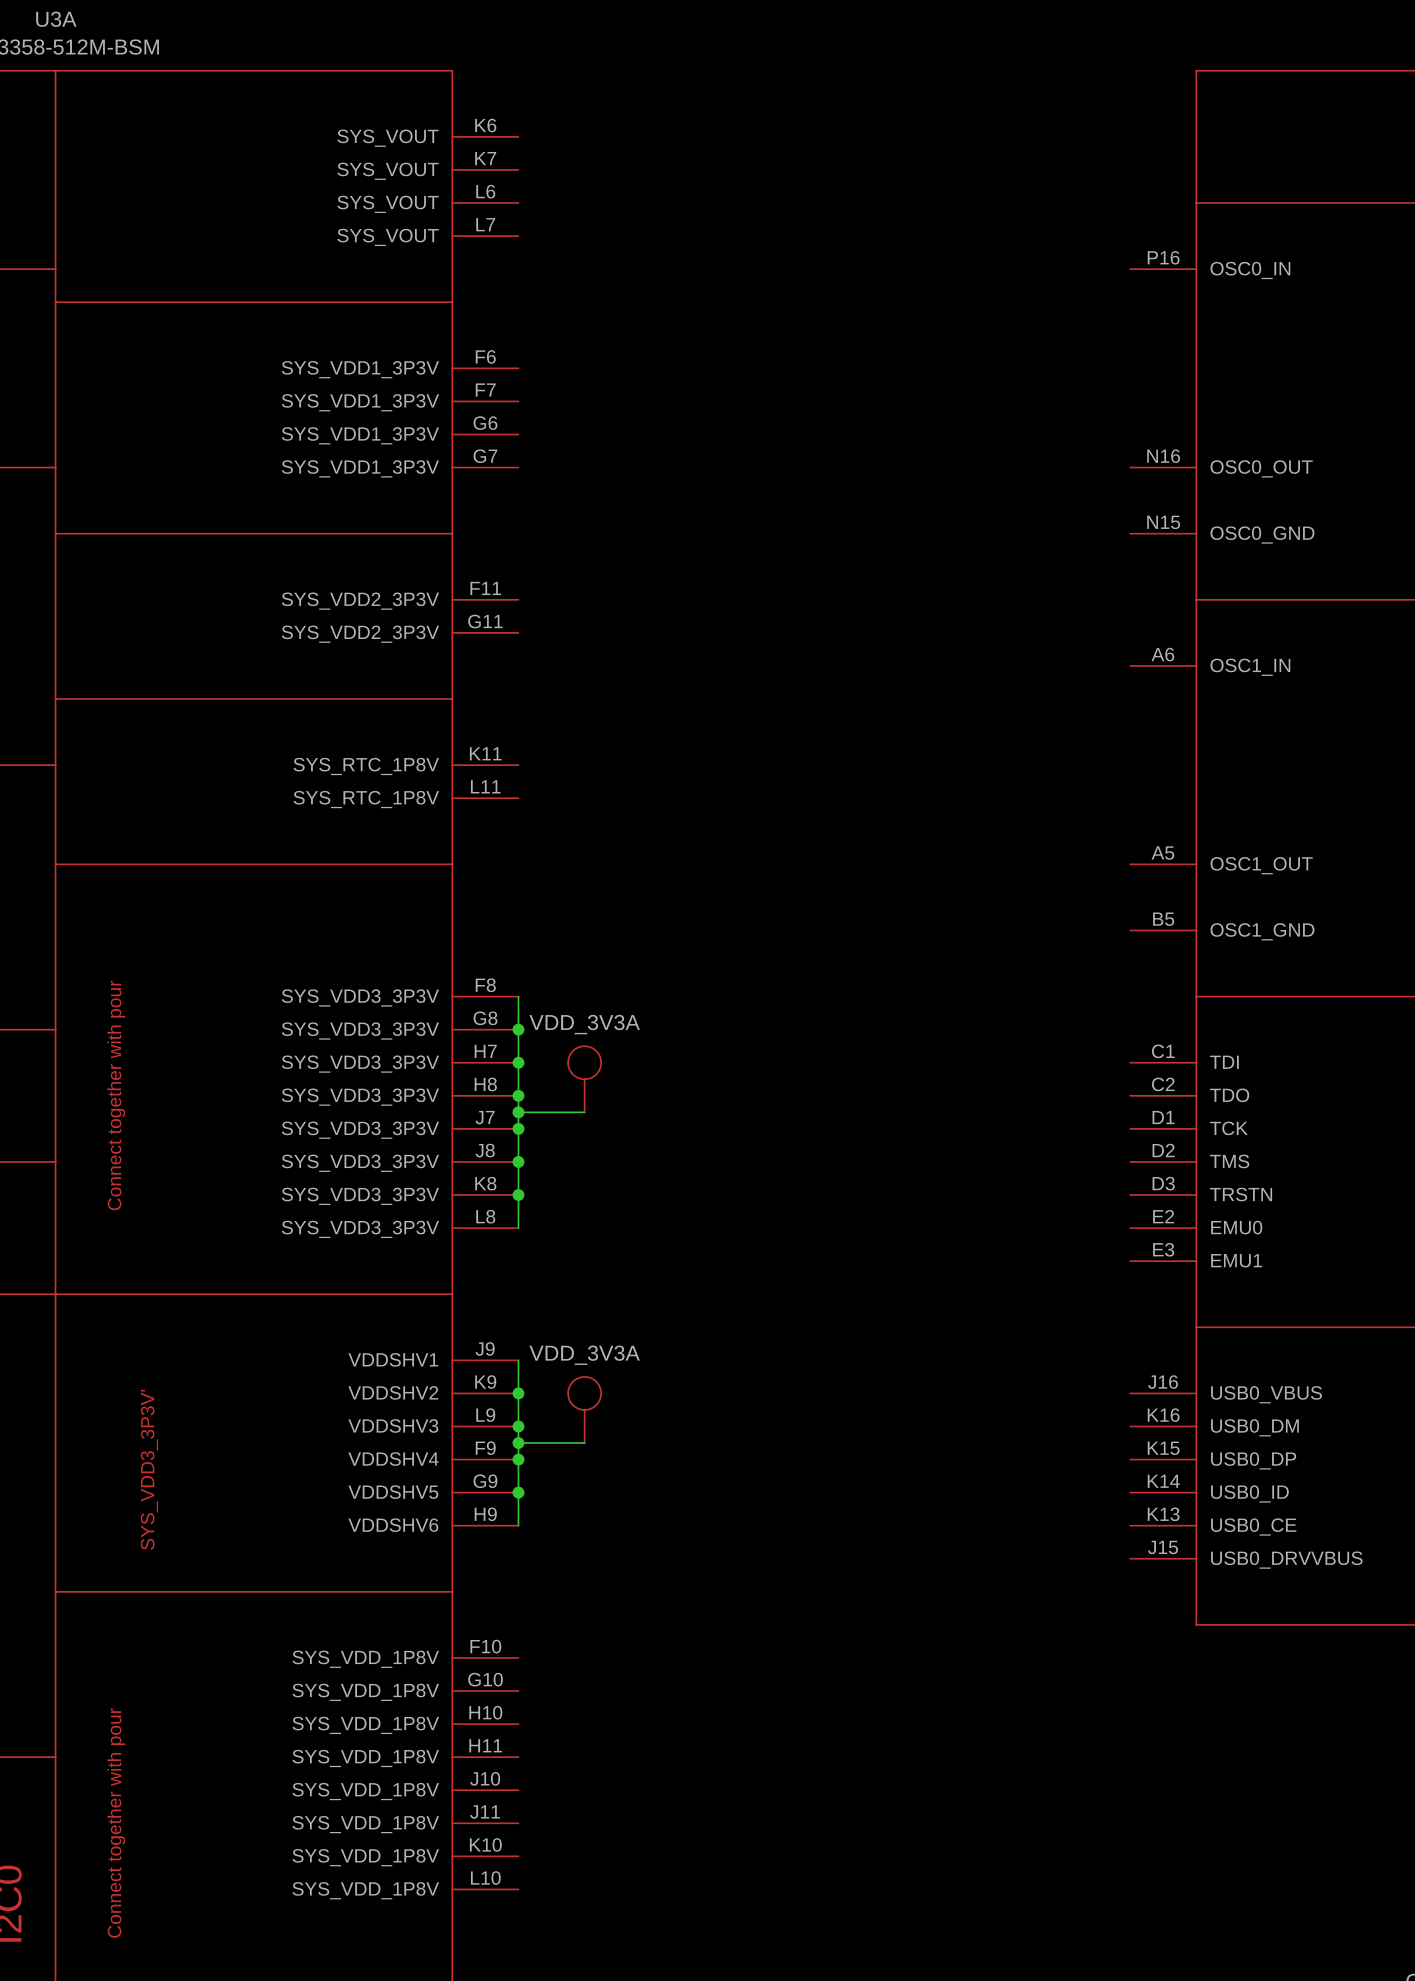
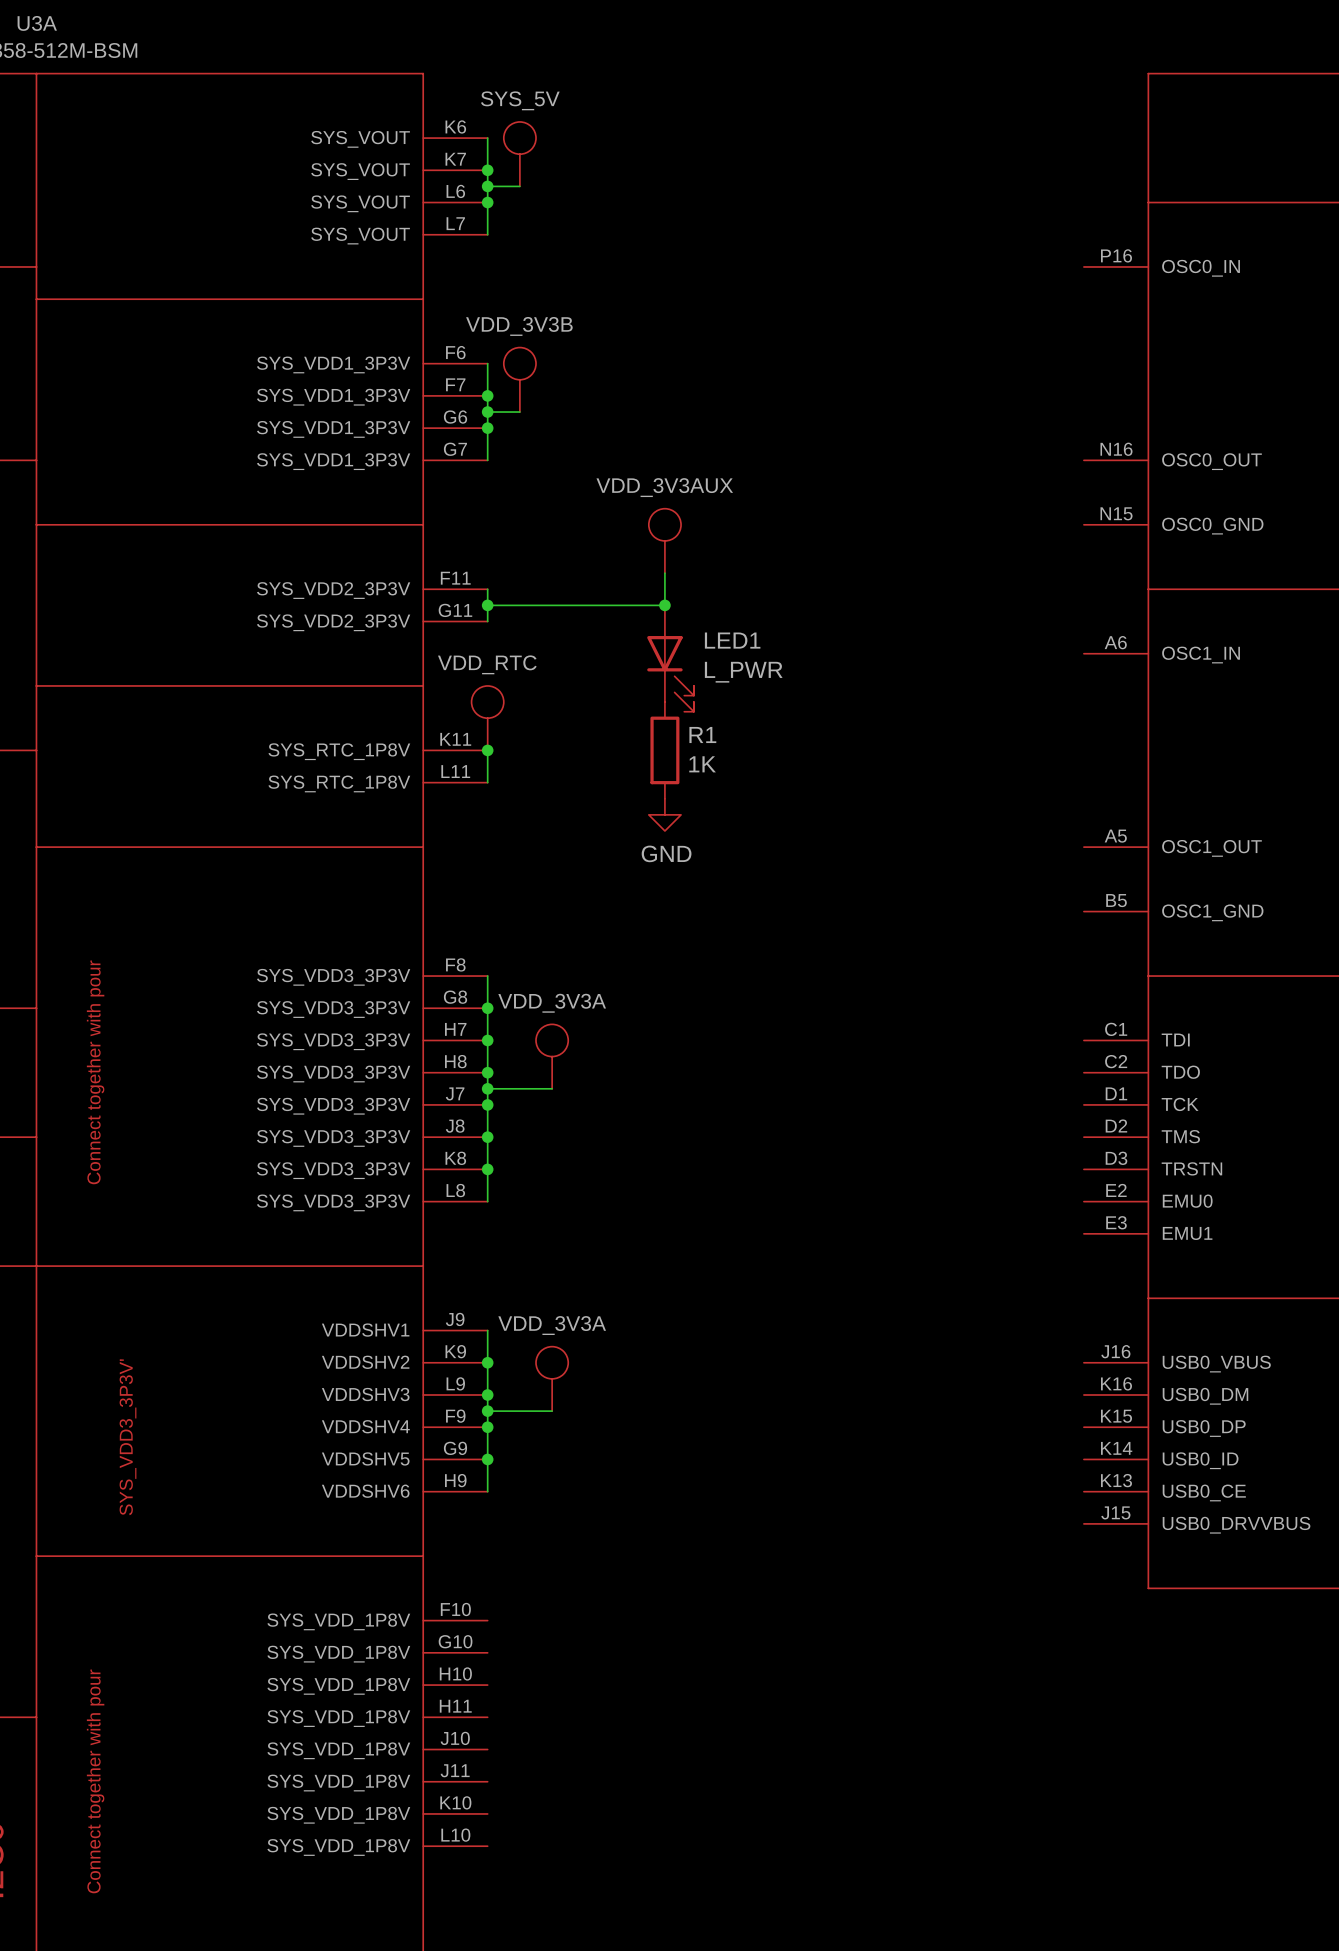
wire: none -> (487, 138) (487, 234)
power symbol: none -> SYS_5V (519, 154)
junction: none -> (487, 170)
wire: none -> (487, 186) (519, 186)
junction: none -> (487, 186)
junction: none -> (487, 202)
wire: none -> (487, 363) (487, 460)
power symbol: none -> VDD_3V3B (519, 379)
junction: none -> (487, 395)
wire: none -> (487, 412) (519, 412)
junction: none -> (487, 412)
junction: none -> (487, 428)
power symbol: none -> VDD_3V3AUX (664, 540)
wire: none -> (664, 573) (664, 605) (487, 605)
wire: none -> (487, 589) (487, 621)
junction: none -> (487, 605)
junction: none -> (664, 605)
LED1: none -> L_PWR (670, 658)
power symbol: none -> VDD_RTC (487, 718)
wire: none -> (487, 750) (487, 782)
junction: none -> (487, 750)
R1: none -> 1K (664, 750)
power symbol: none -> GND (664, 814)

